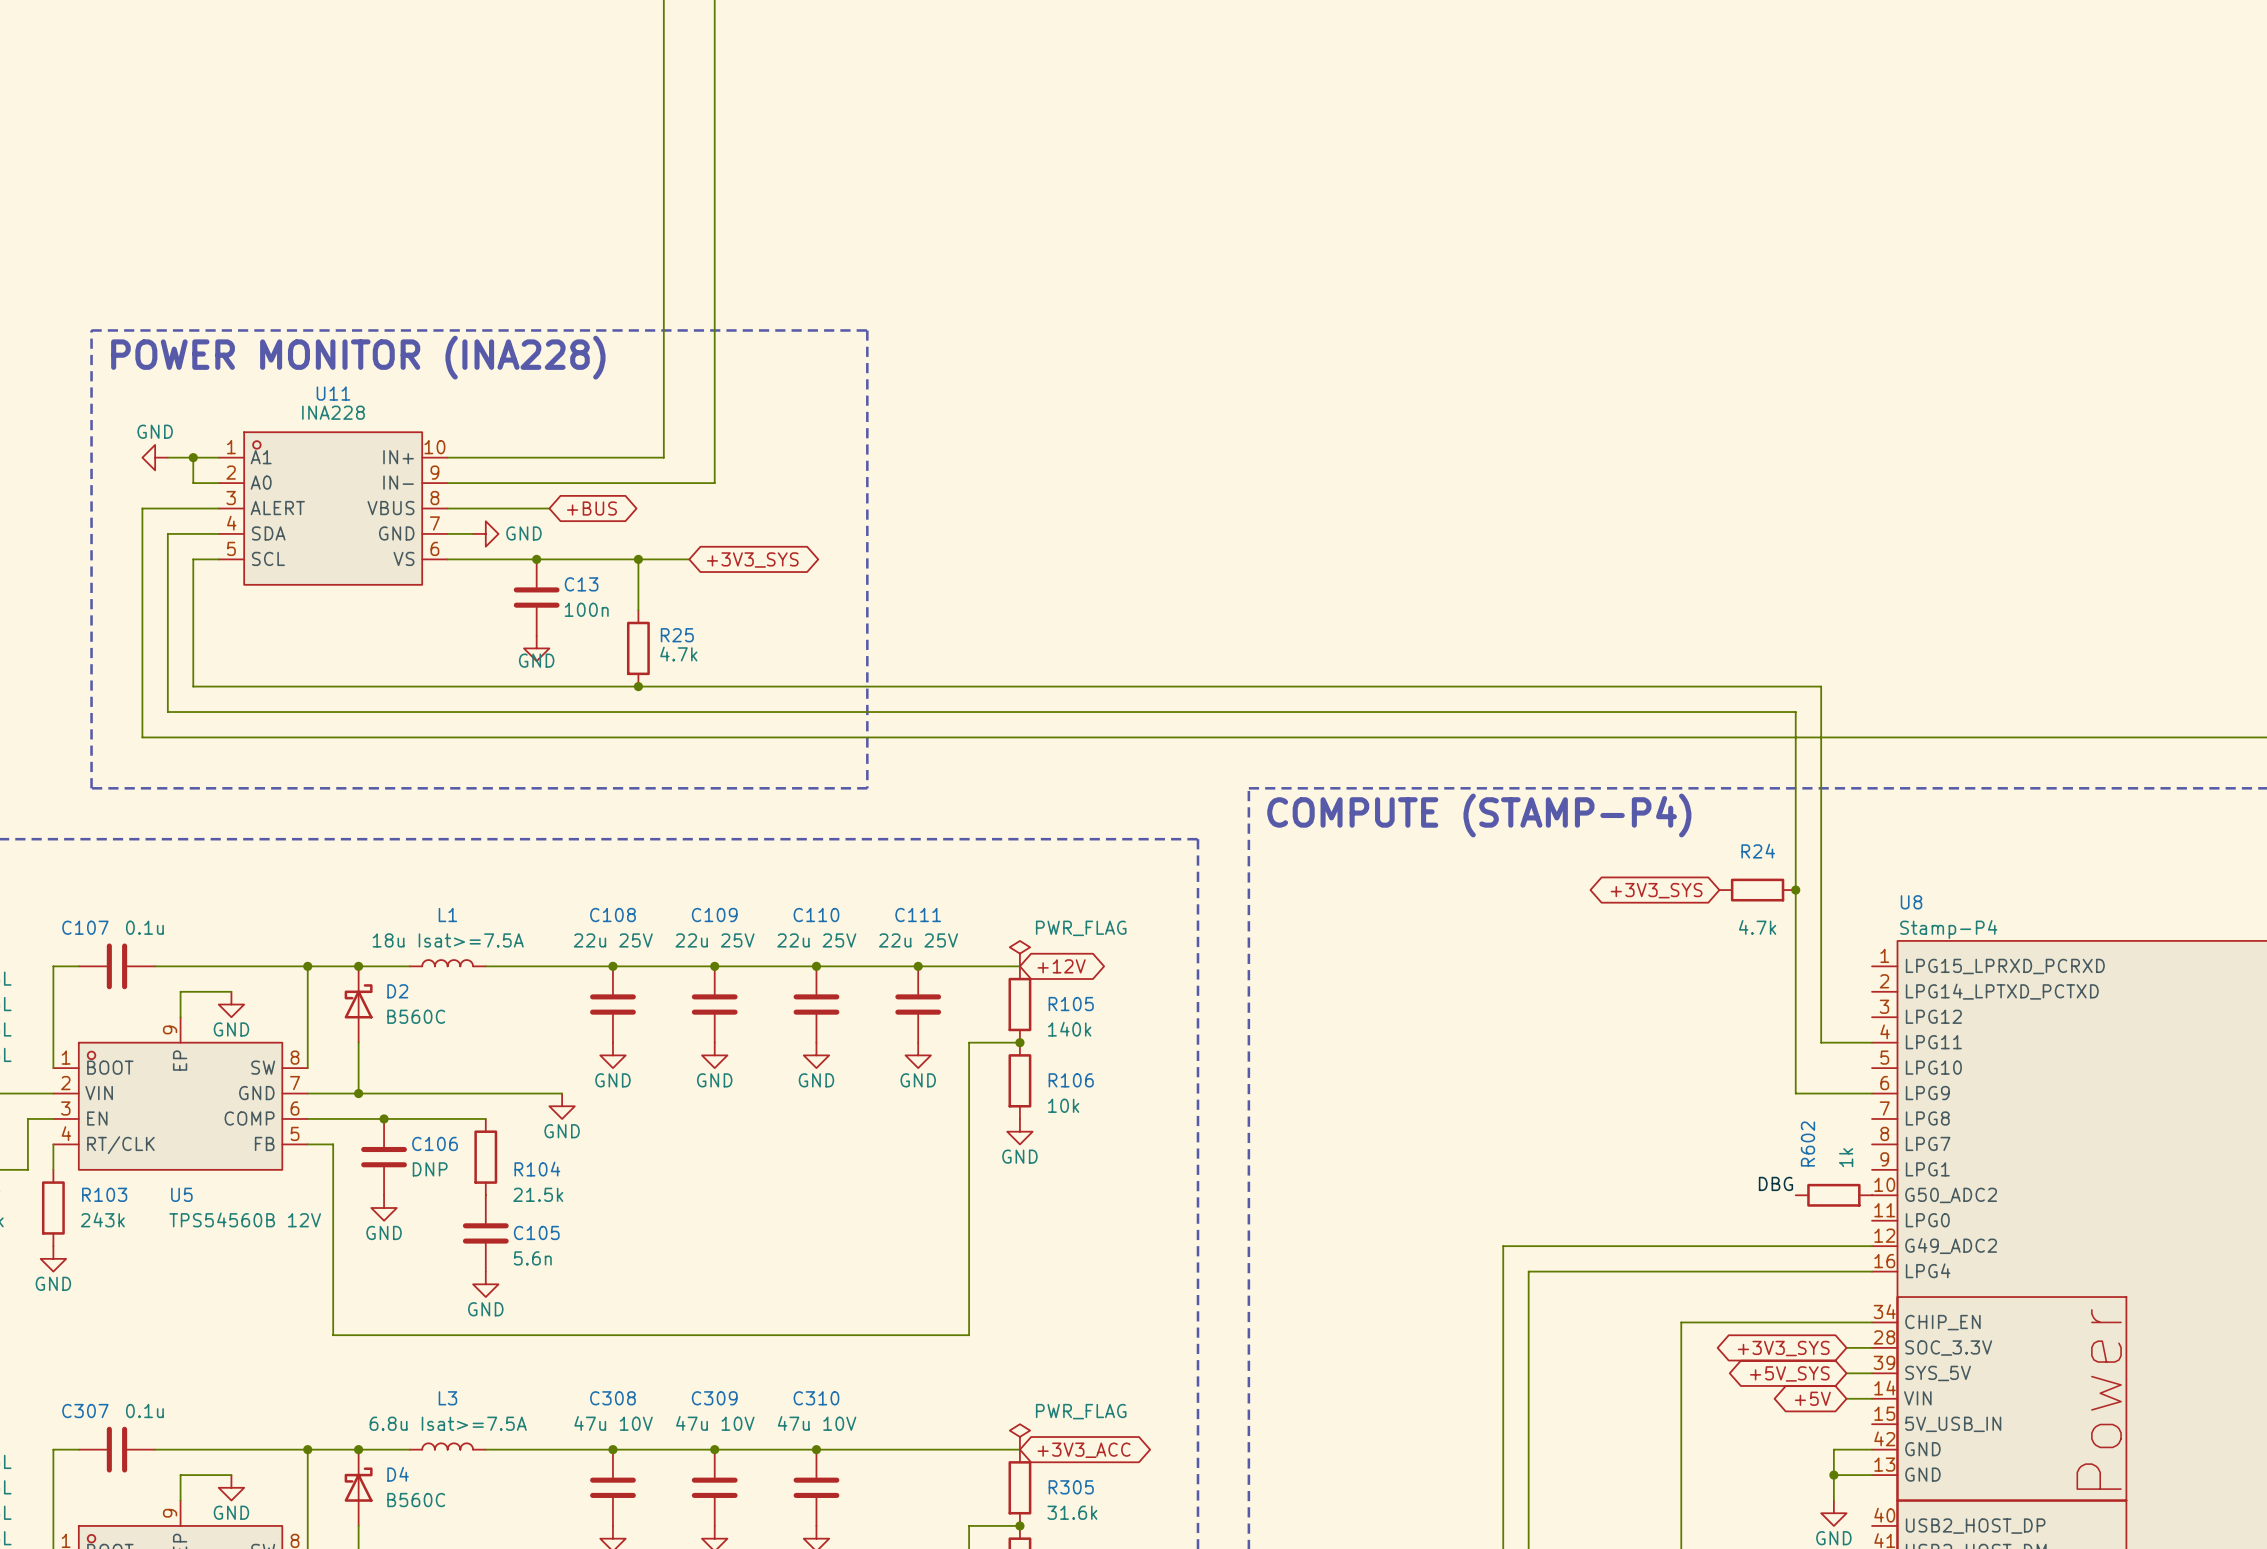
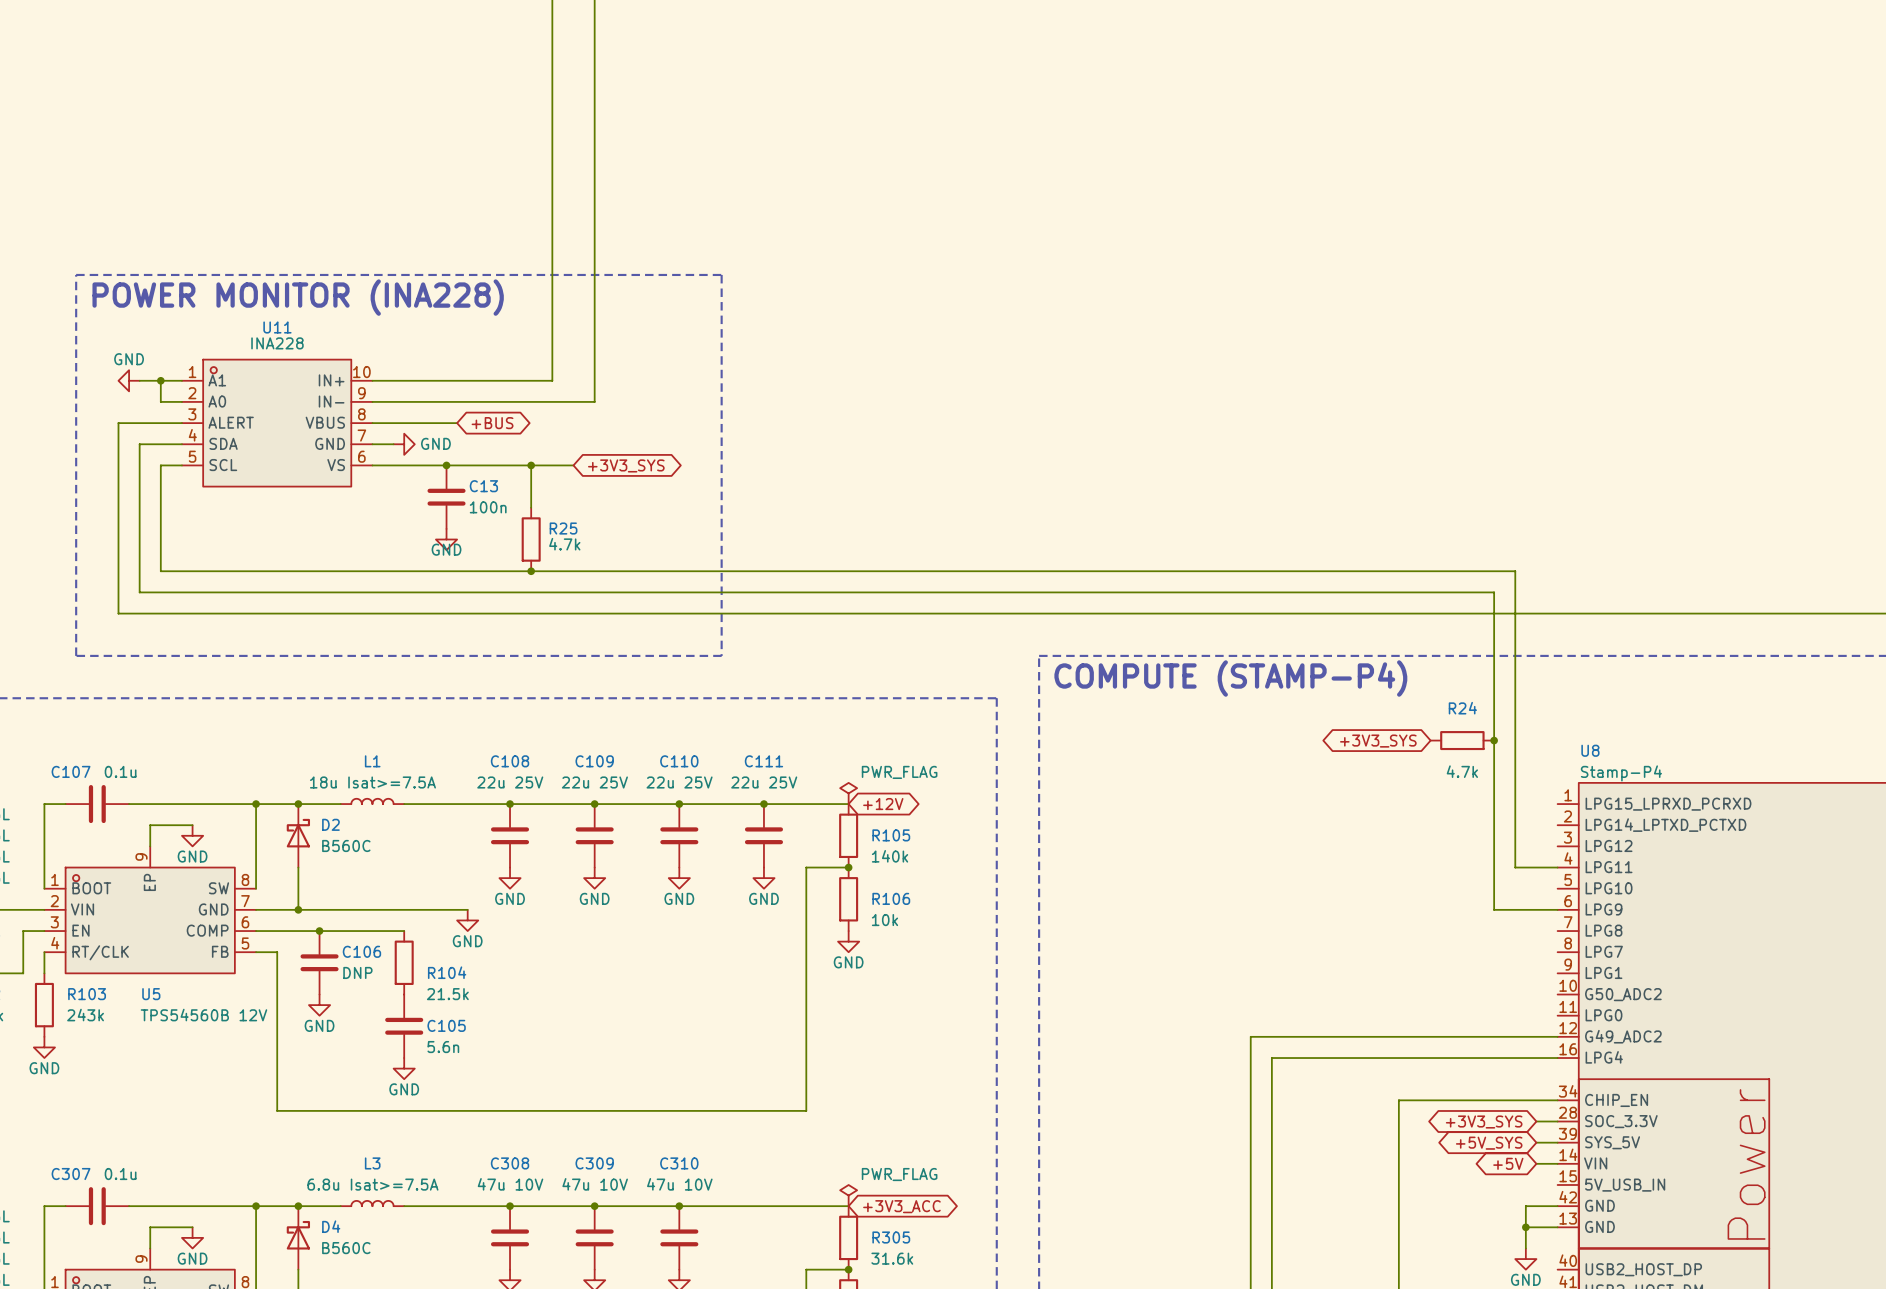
label: DBG (1775, 1183) -> none
R602: 1k (1833, 1195) -> none

